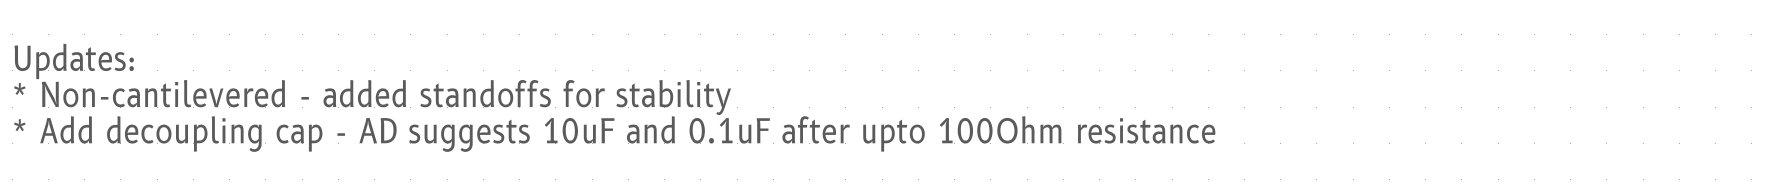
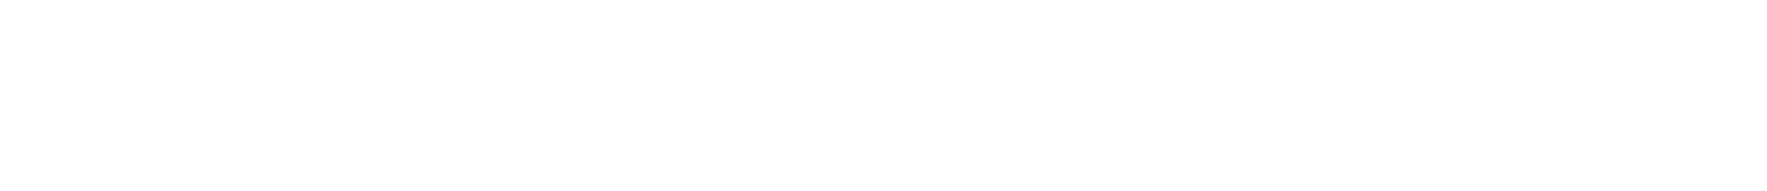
text: Updates: (74, 61) -> none
text: * Non-cantilevered - added standoffs for stability (372, 97) -> none
text: * Add decoupling cap - AD suggests 10uF and 0.1uF after upto 100Ohm resistance (614, 134) -> none

